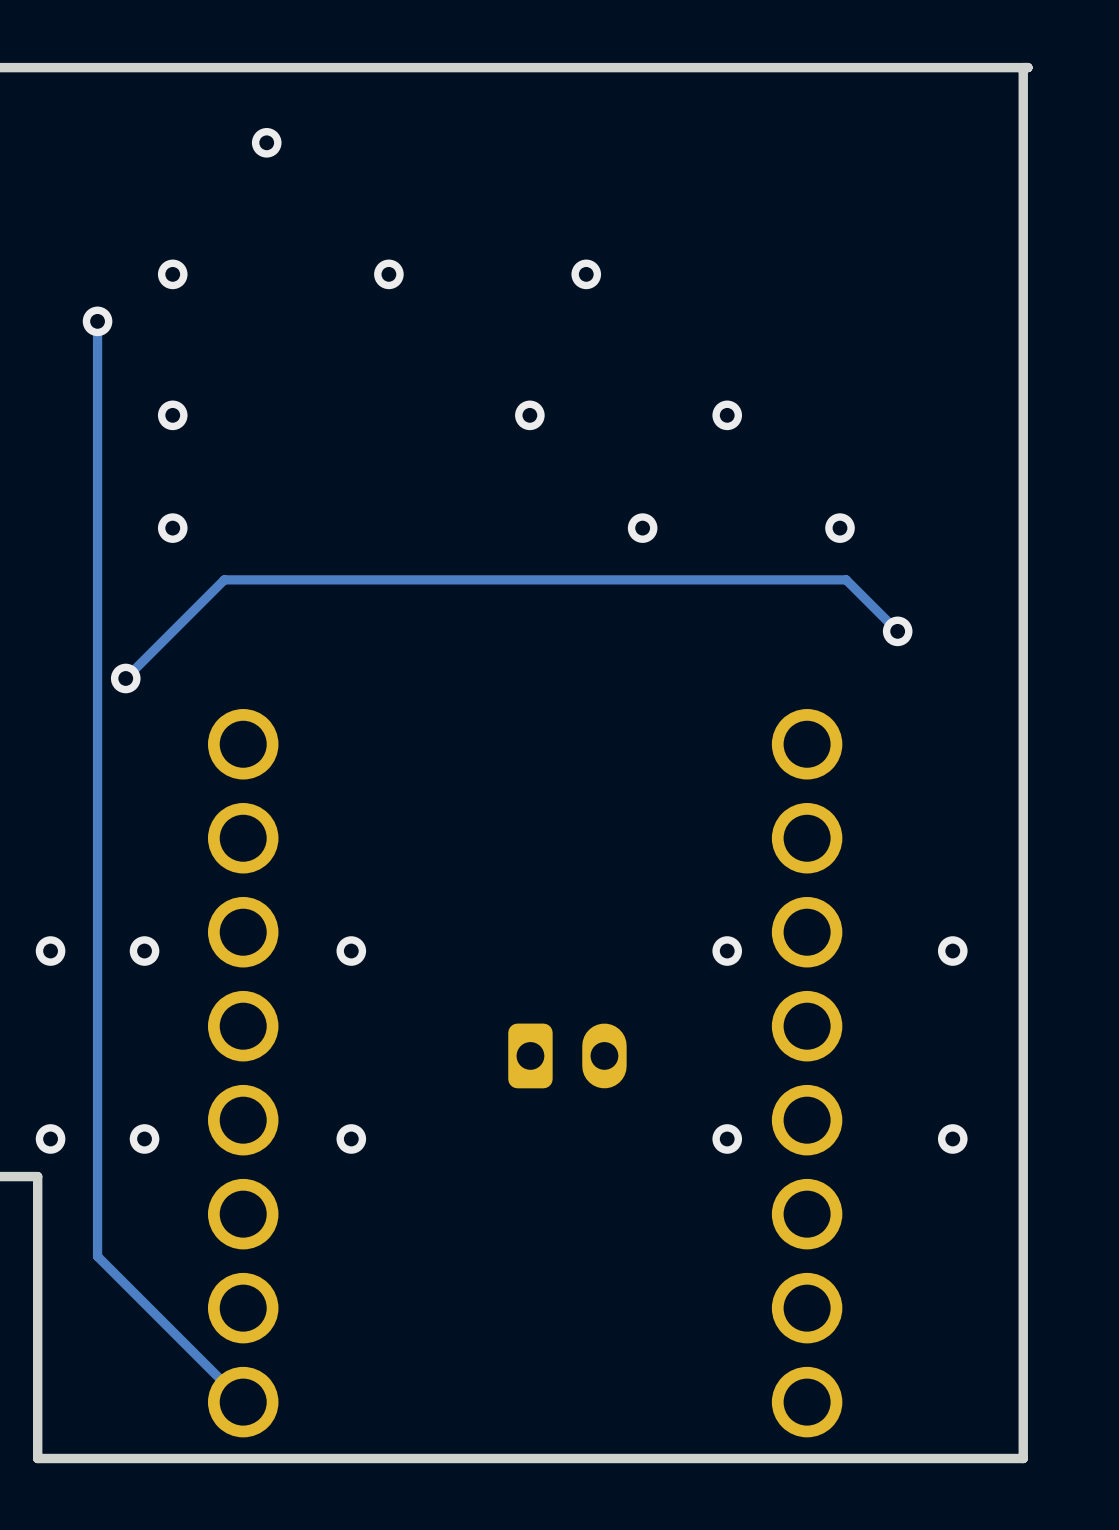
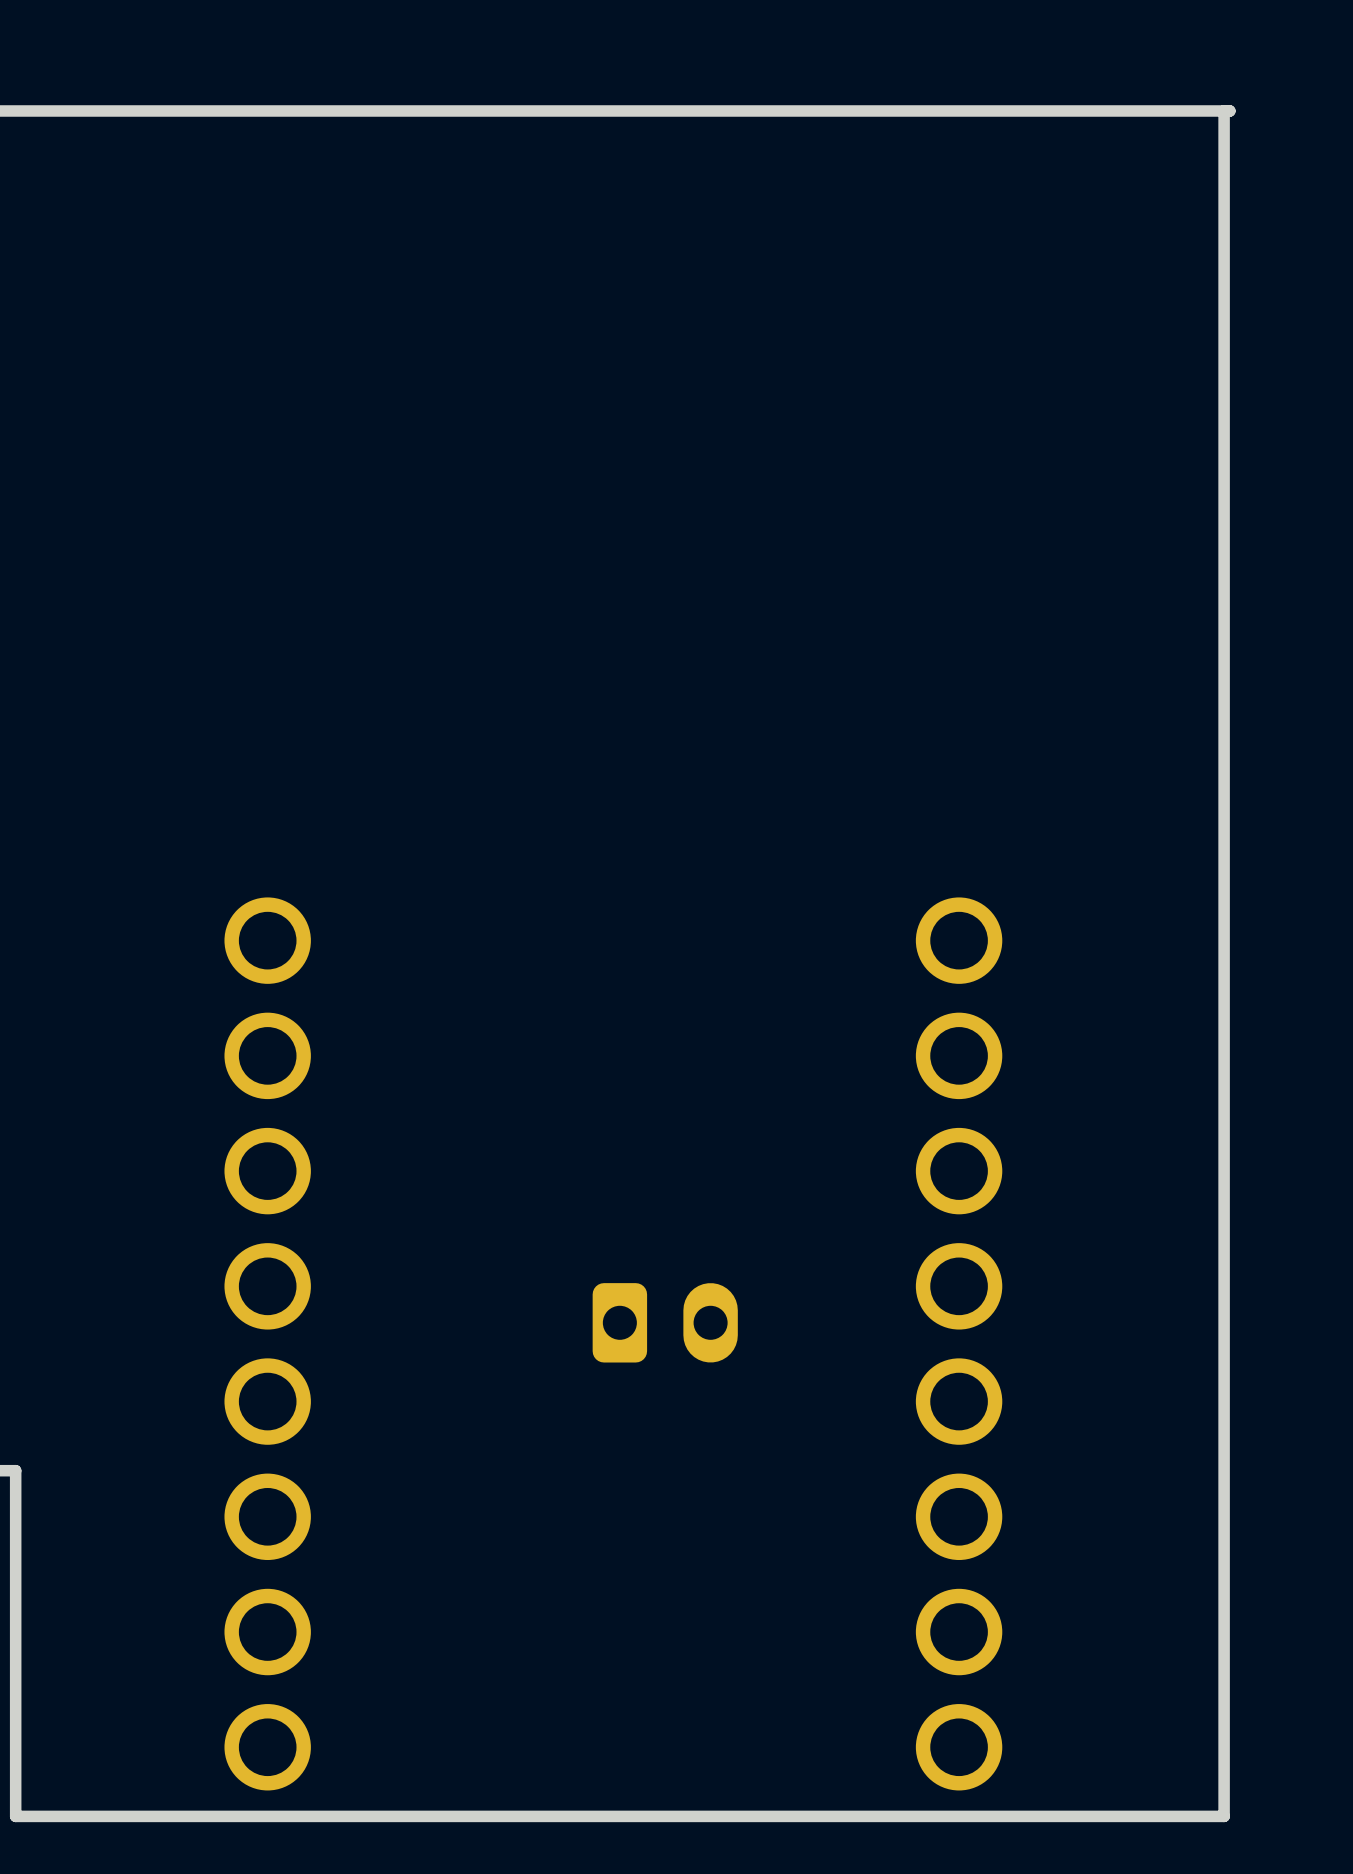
via: (266, 142) -> none
via: (172, 274) -> none
via: (388, 274) -> none
via: (586, 274) -> none
track: (97, 321) (97, 1256) (243, 1402) -> none
via: (97, 321) -> none
via: (172, 415) -> none
via: (529, 415) -> none
via: (727, 415) -> none
via: (172, 528) -> none
via: (642, 528) -> none
via: (839, 528) -> none
track: (897, 631) (846, 579) (224, 579) (125, 678) -> none
via: (897, 631) -> none
via: (125, 678) -> none
via: (50, 951) -> none
via: (144, 951) -> none
via: (351, 951) -> none
via: (727, 951) -> none
via: (952, 951) -> none
via: (50, 1138) -> none
via: (144, 1138) -> none
via: (351, 1138) -> none
via: (727, 1138) -> none
via: (952, 1138) -> none

